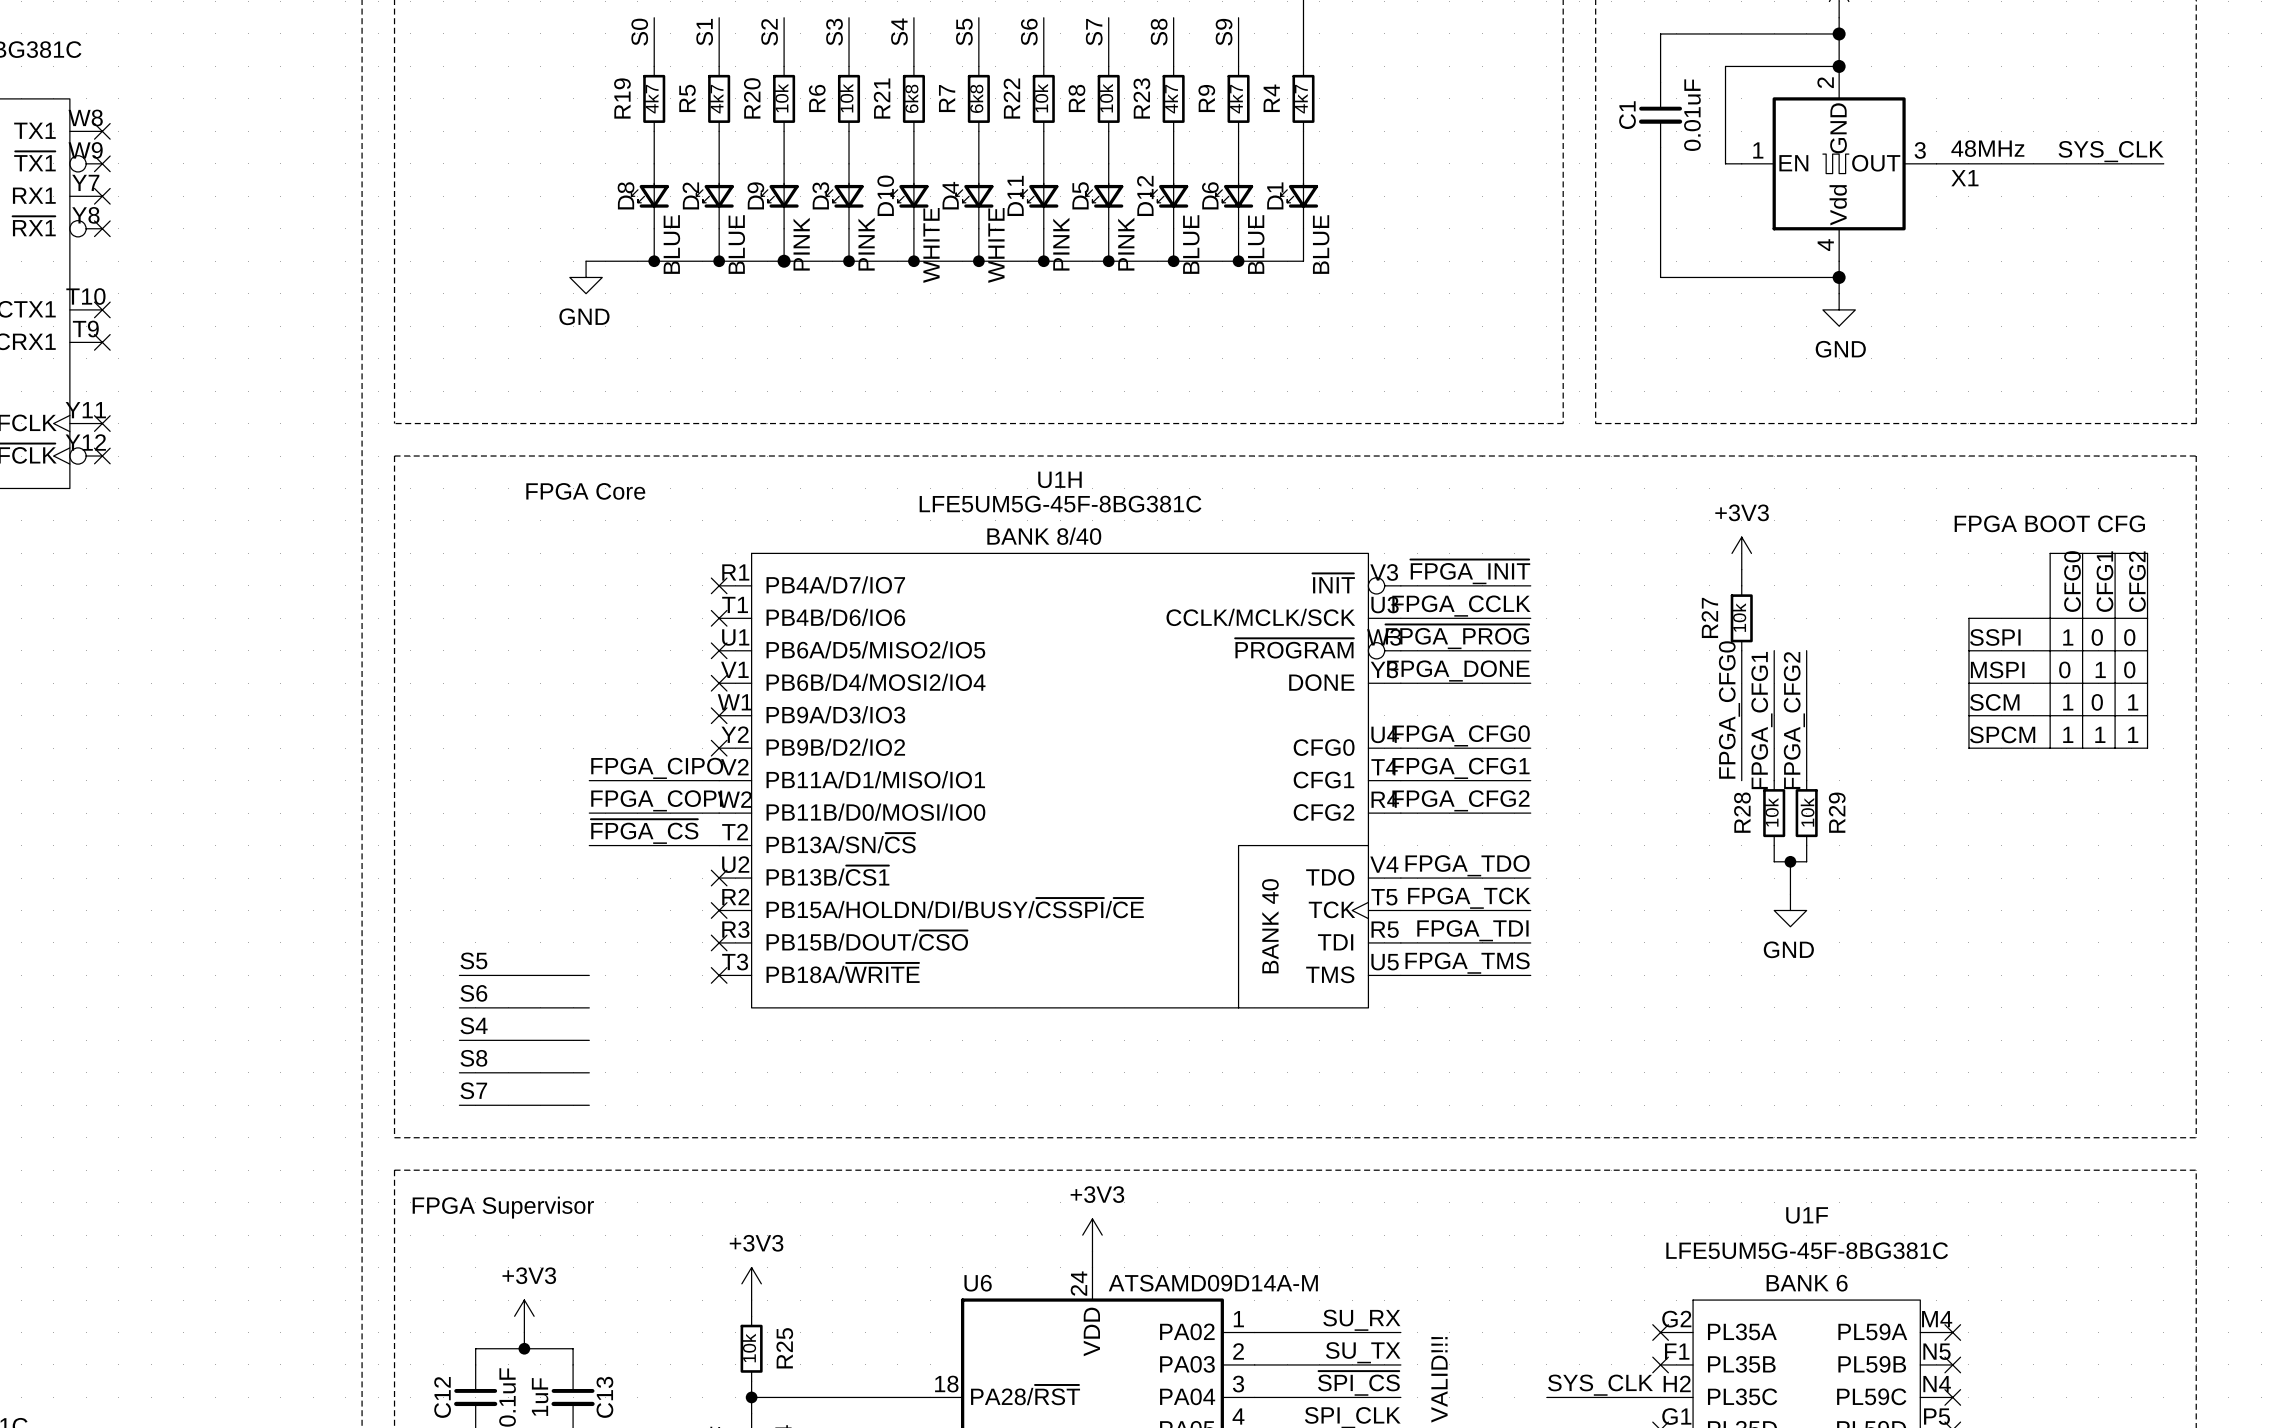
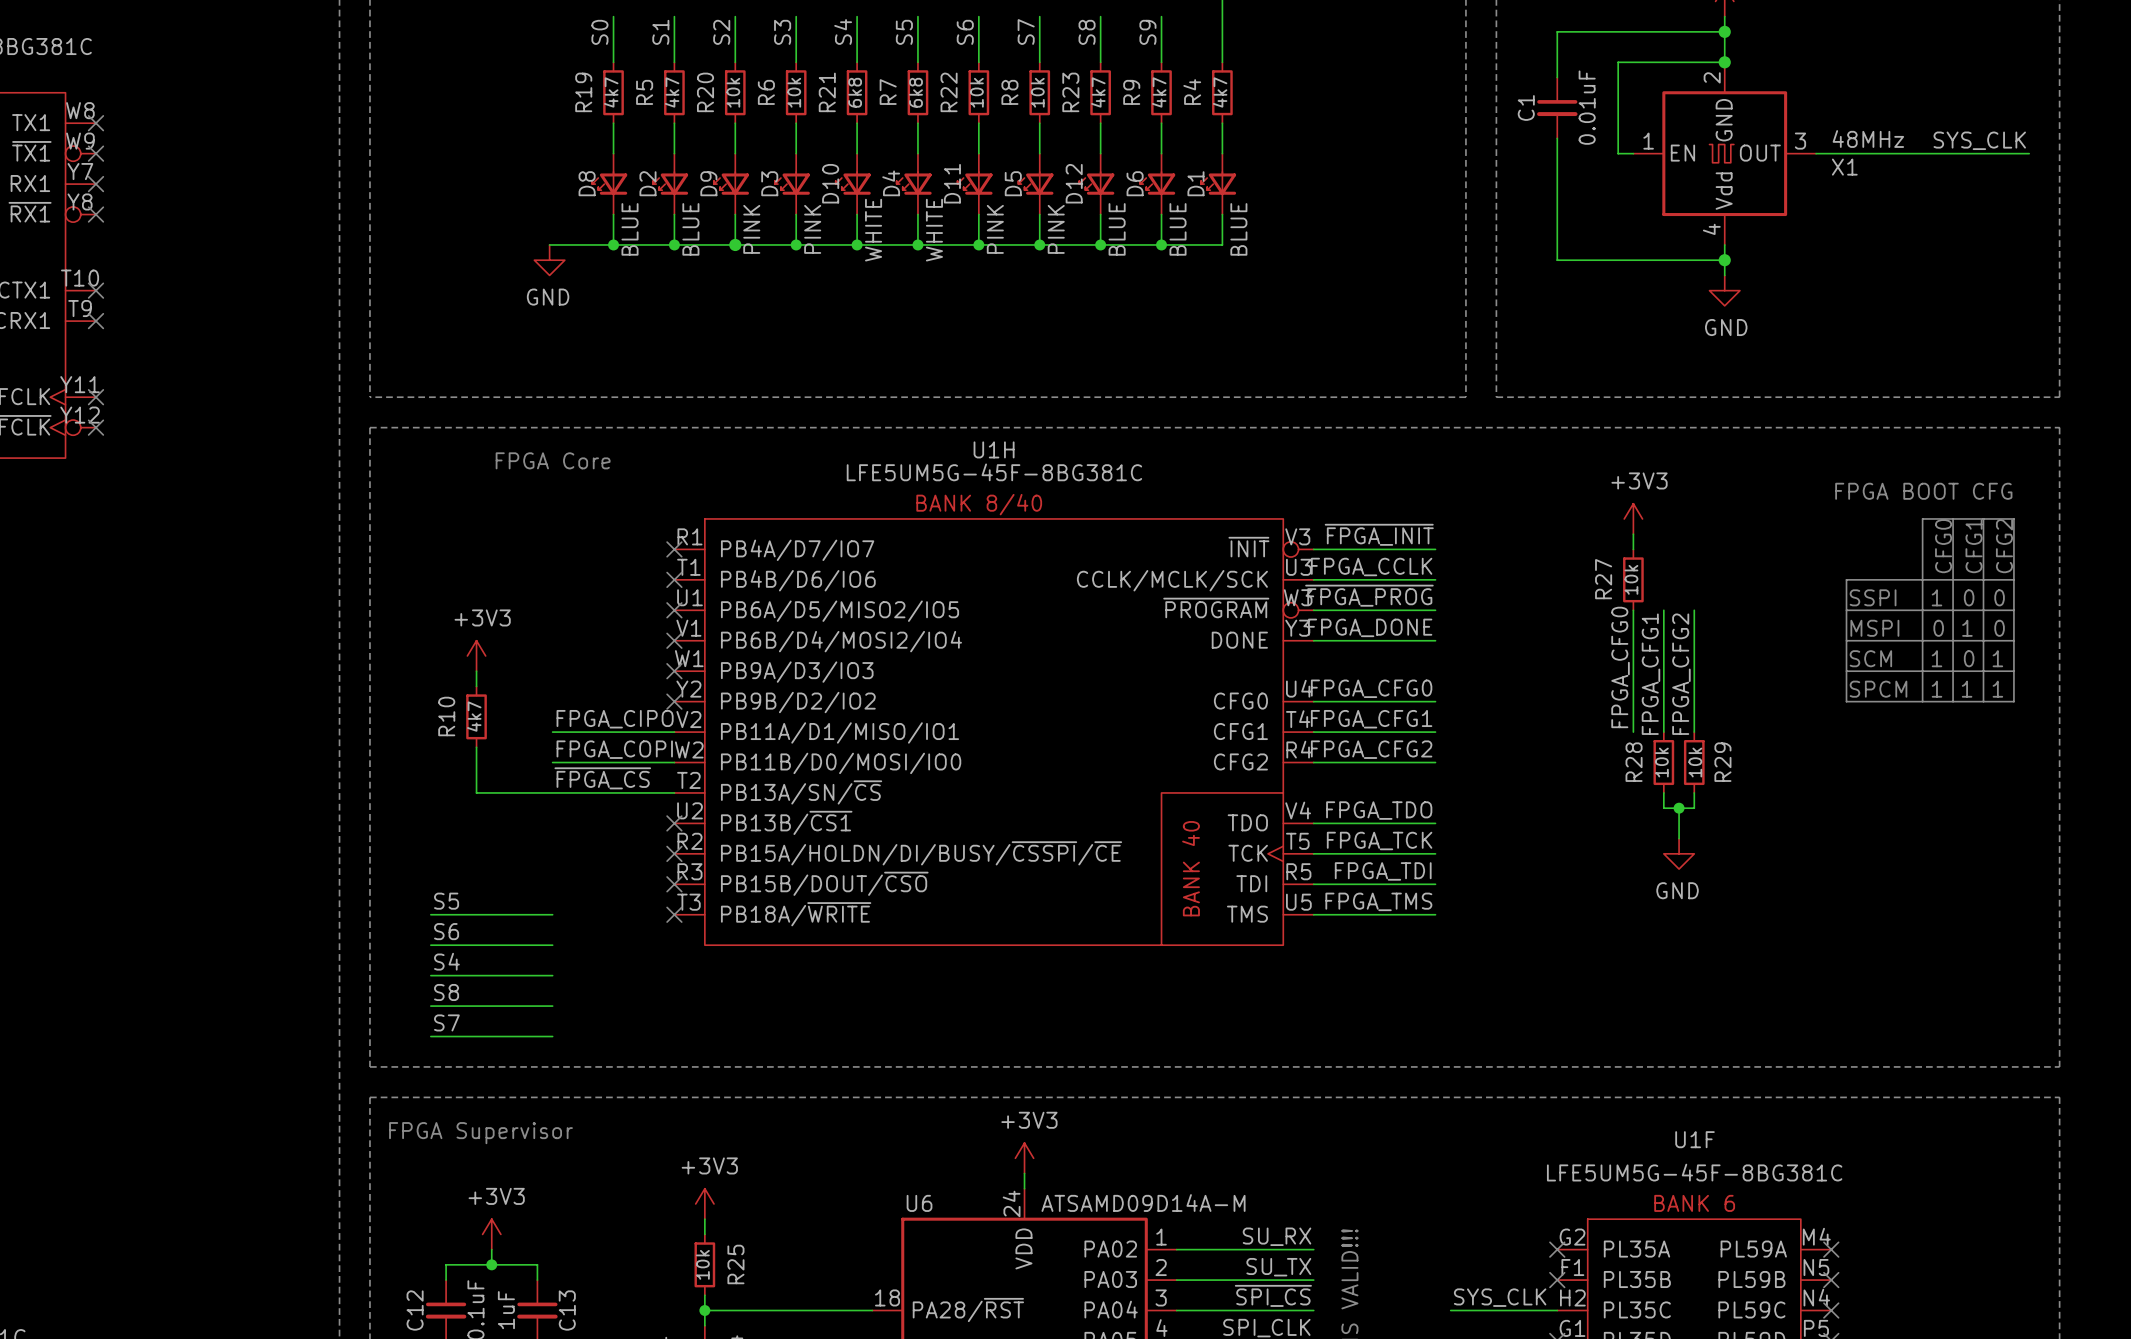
power symbol: none -> +3V3 (476, 655)
wire: none -> (476, 671) (476, 686)
R10: none -> 4k7 (476, 716)
wire: none -> (476, 747) (476, 792) (552, 792)

